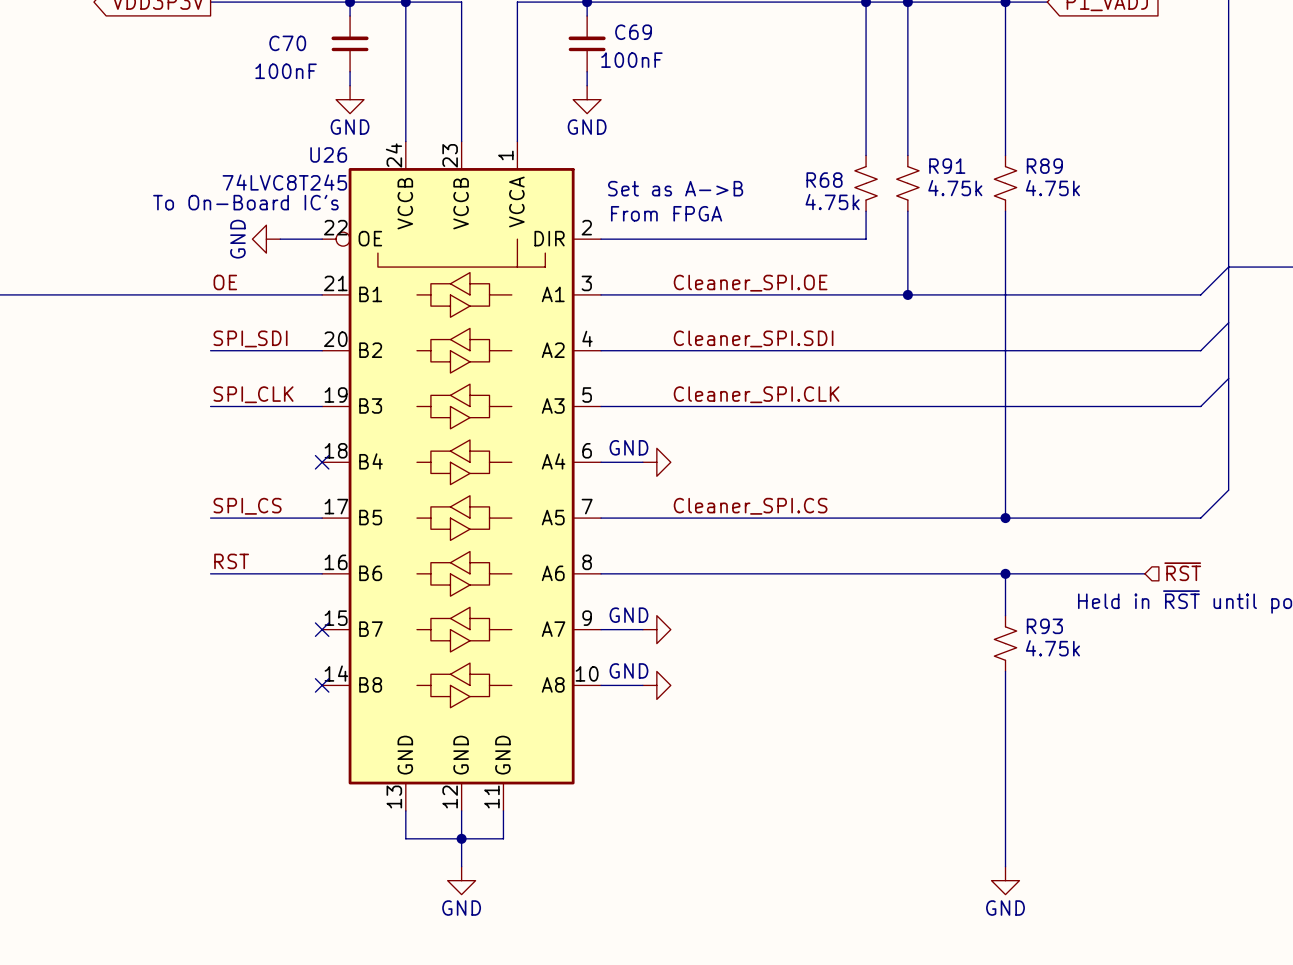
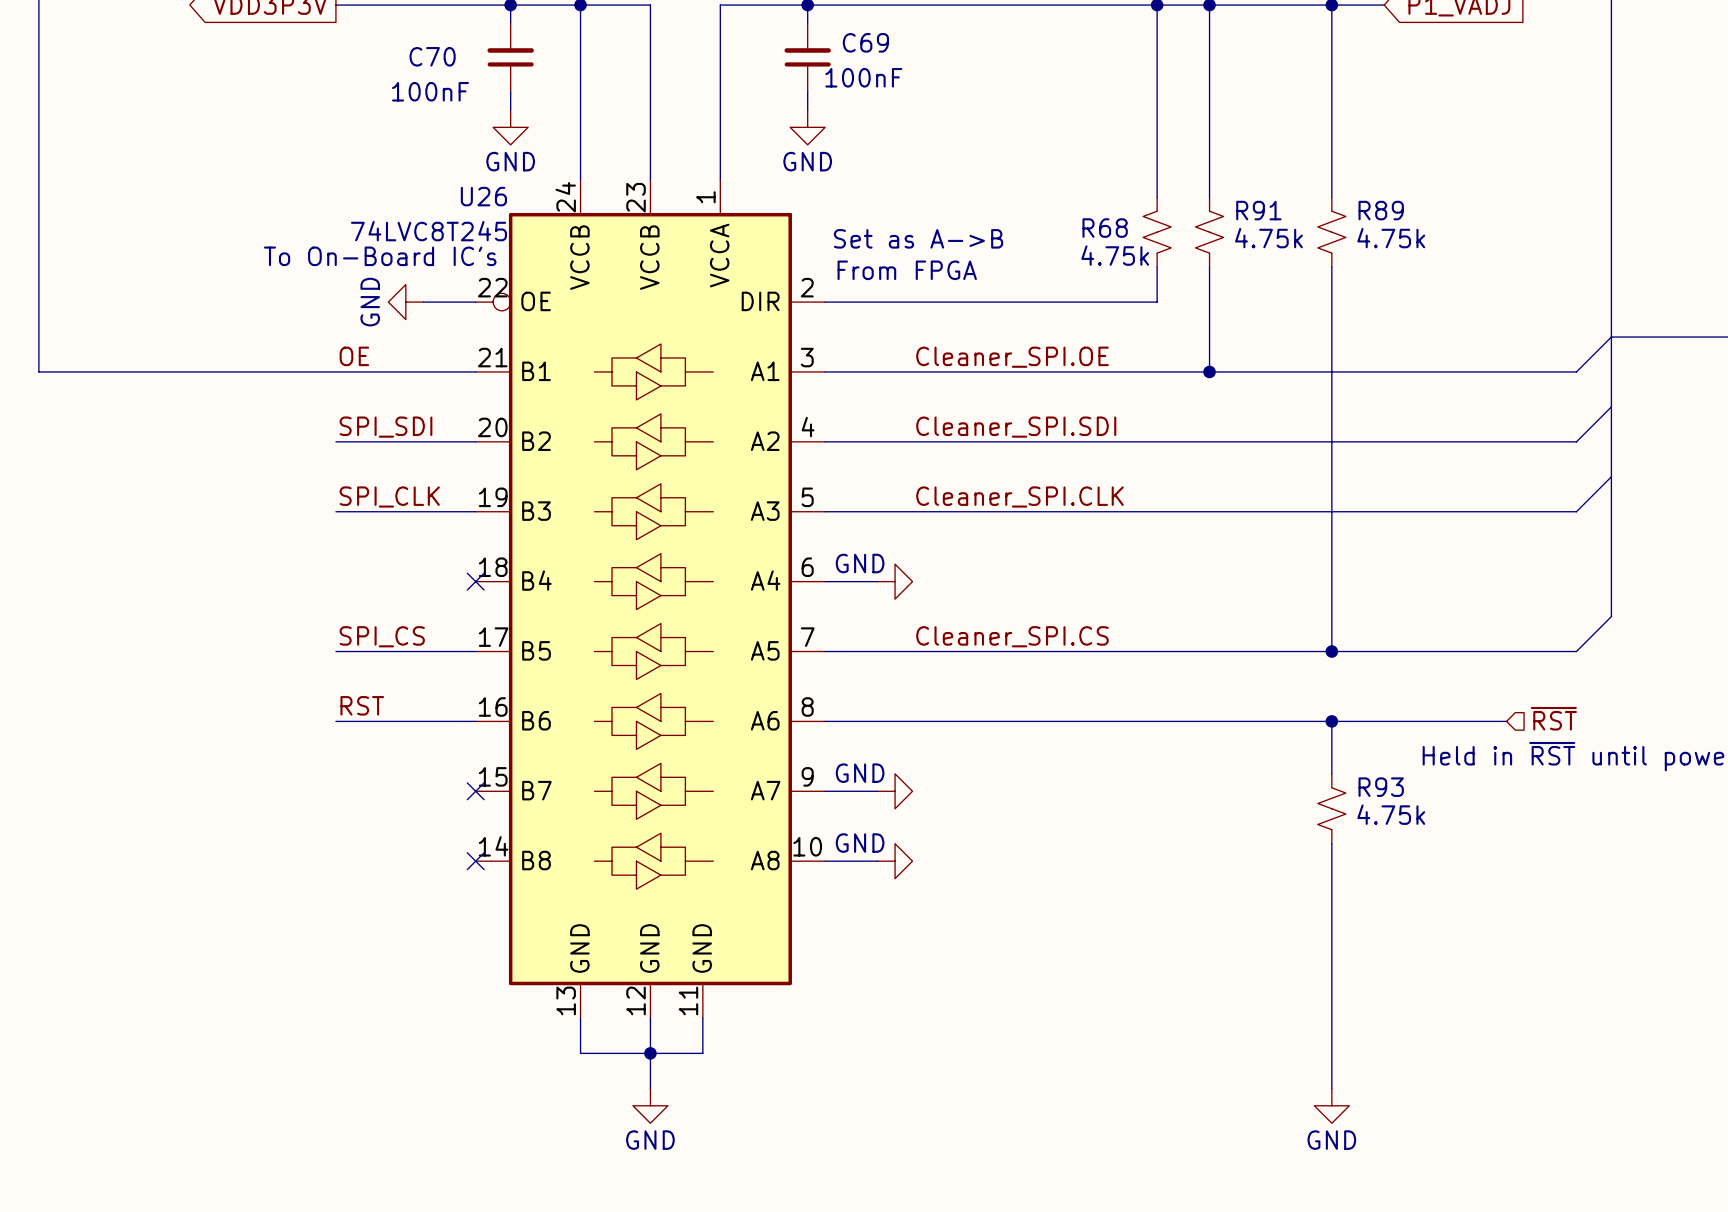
U26 symbol: [322, 141, 602, 811] -> [475, 179, 826, 1019]

